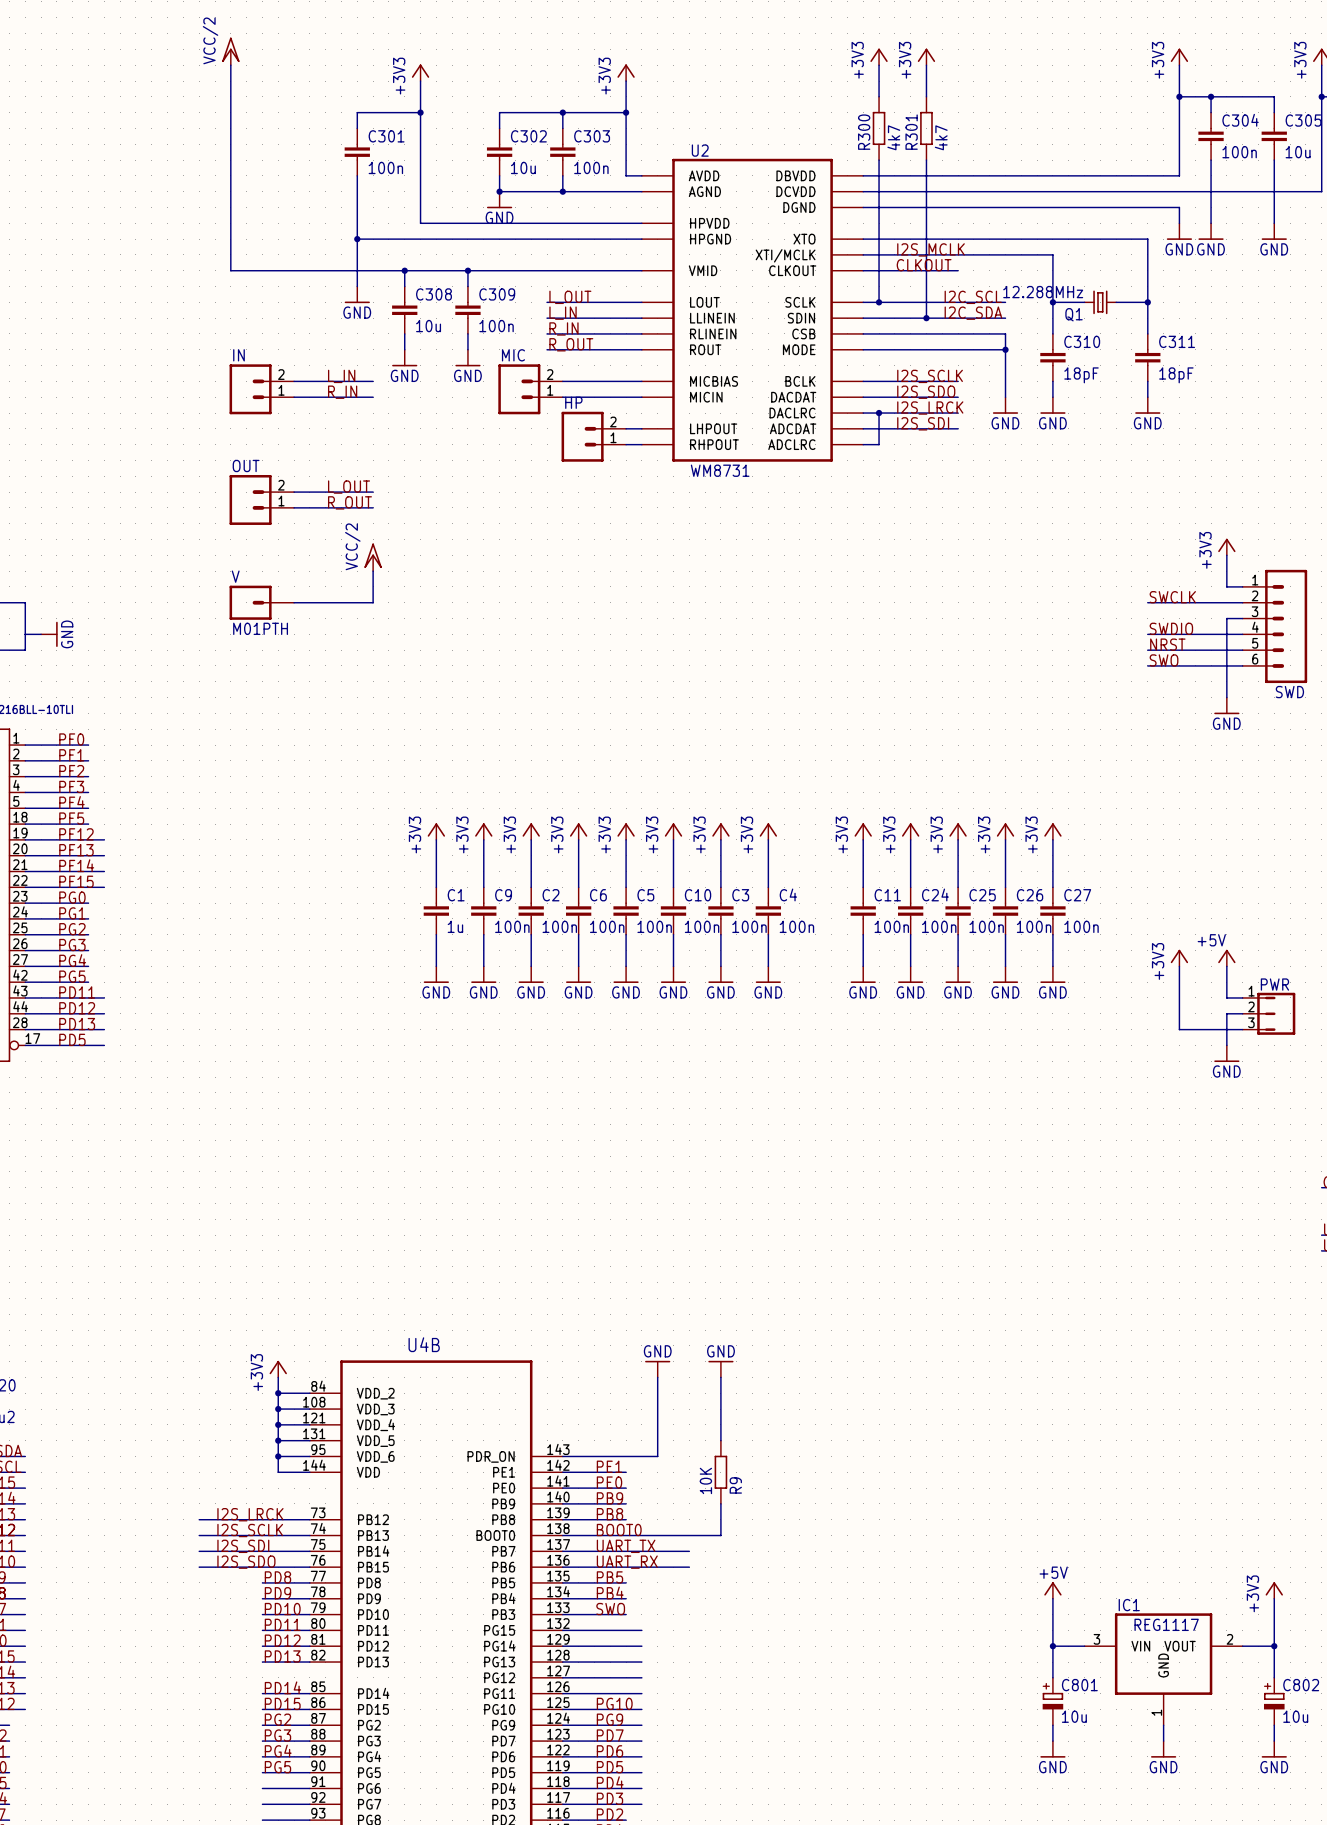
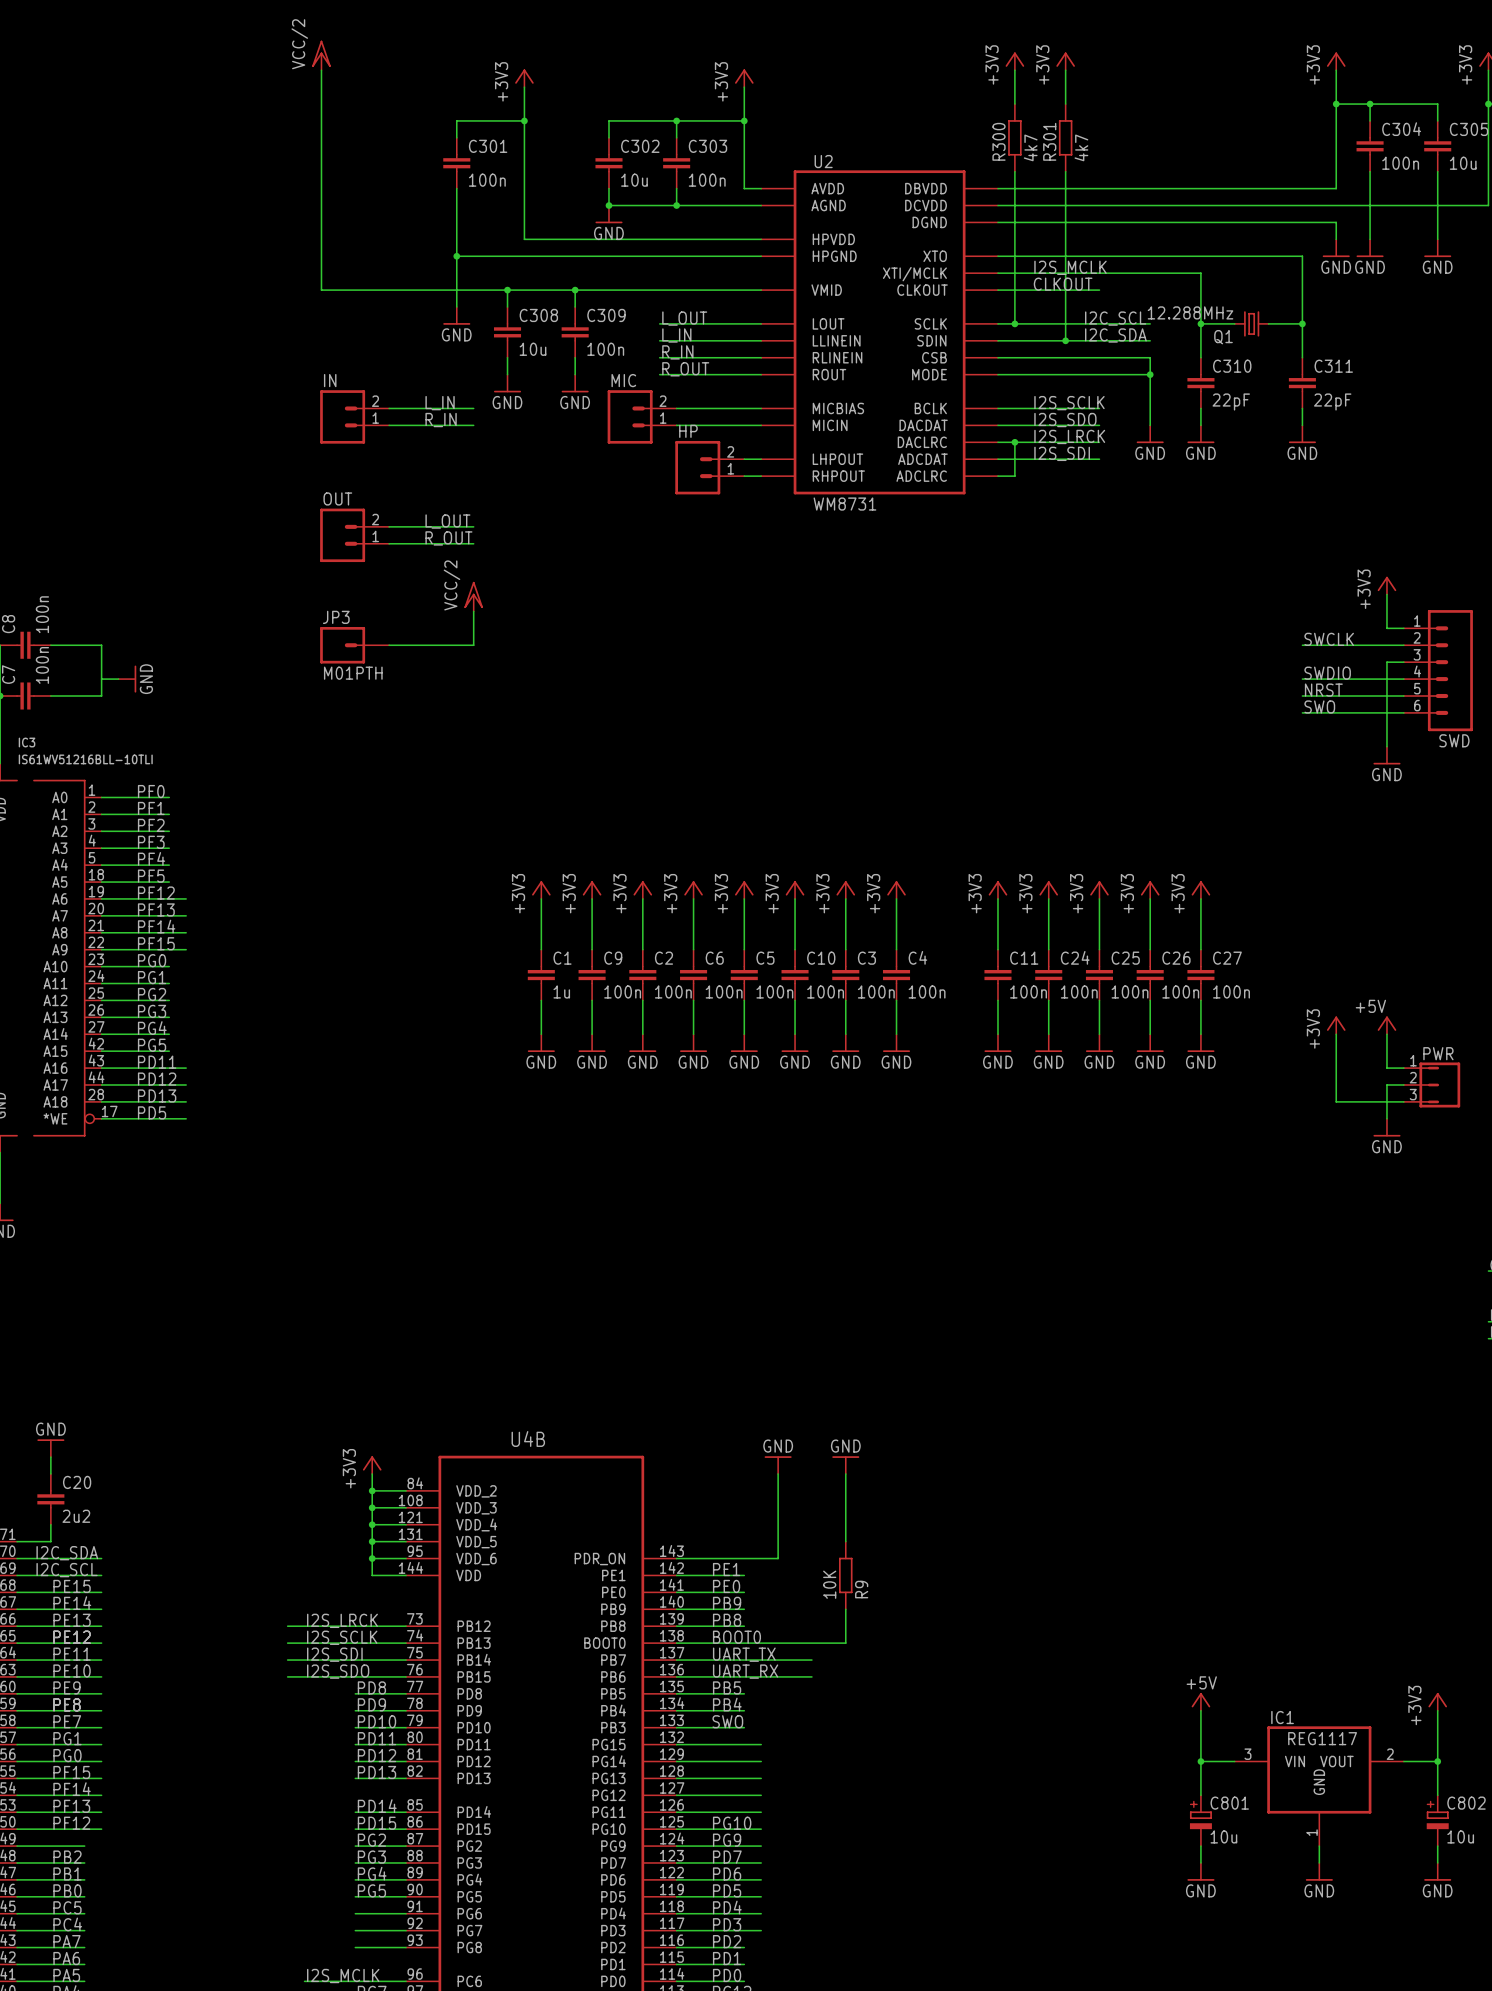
C310 value: 18pF (1081, 375) -> 22pF (1231, 401)
C311 value: 18pF (1176, 375) -> 22pF (1332, 401)
V name: V (235, 576) -> JP3 (336, 617)

